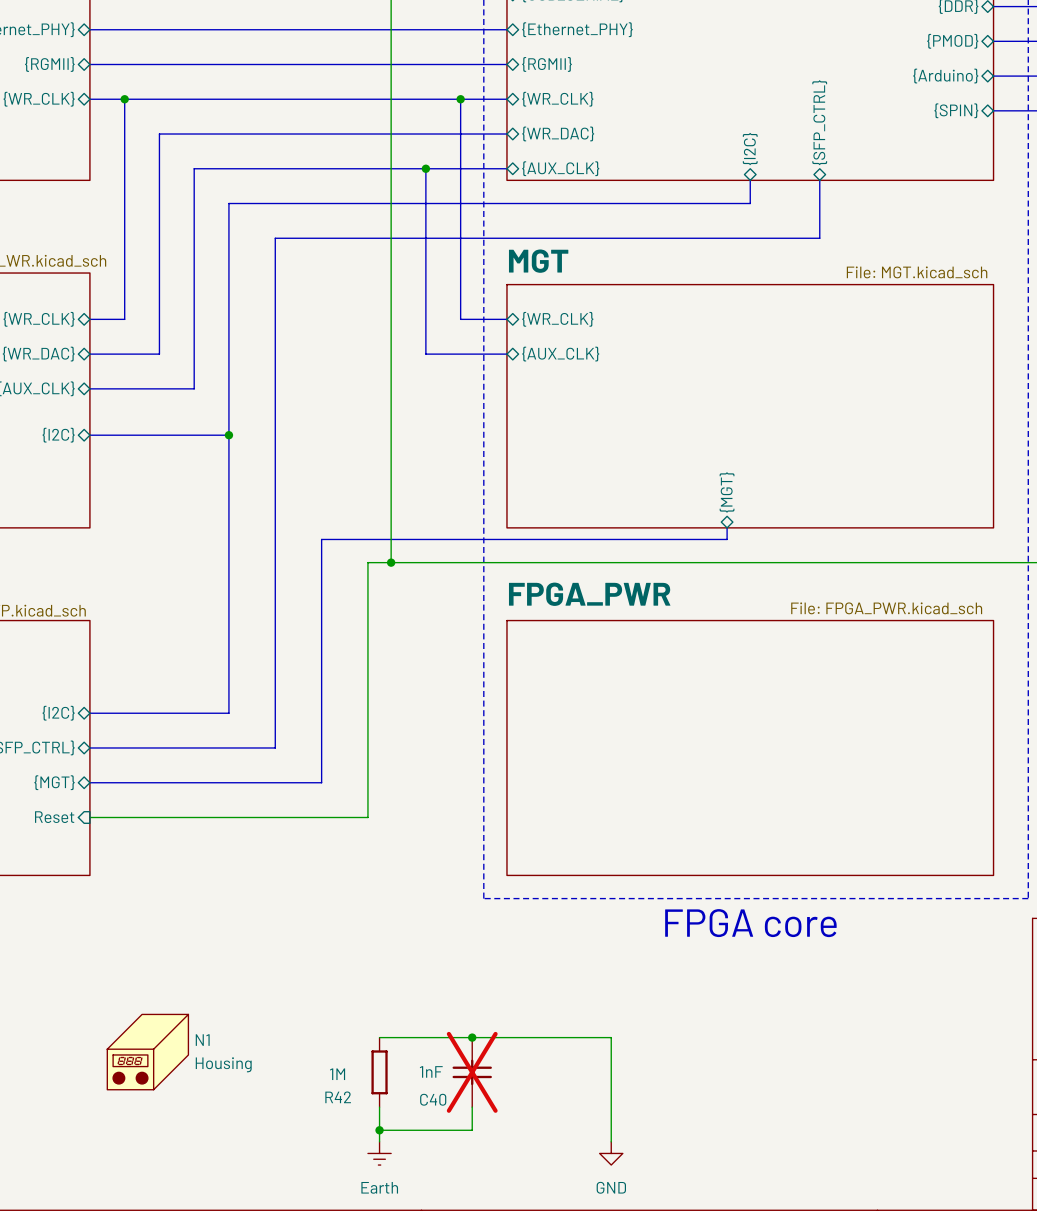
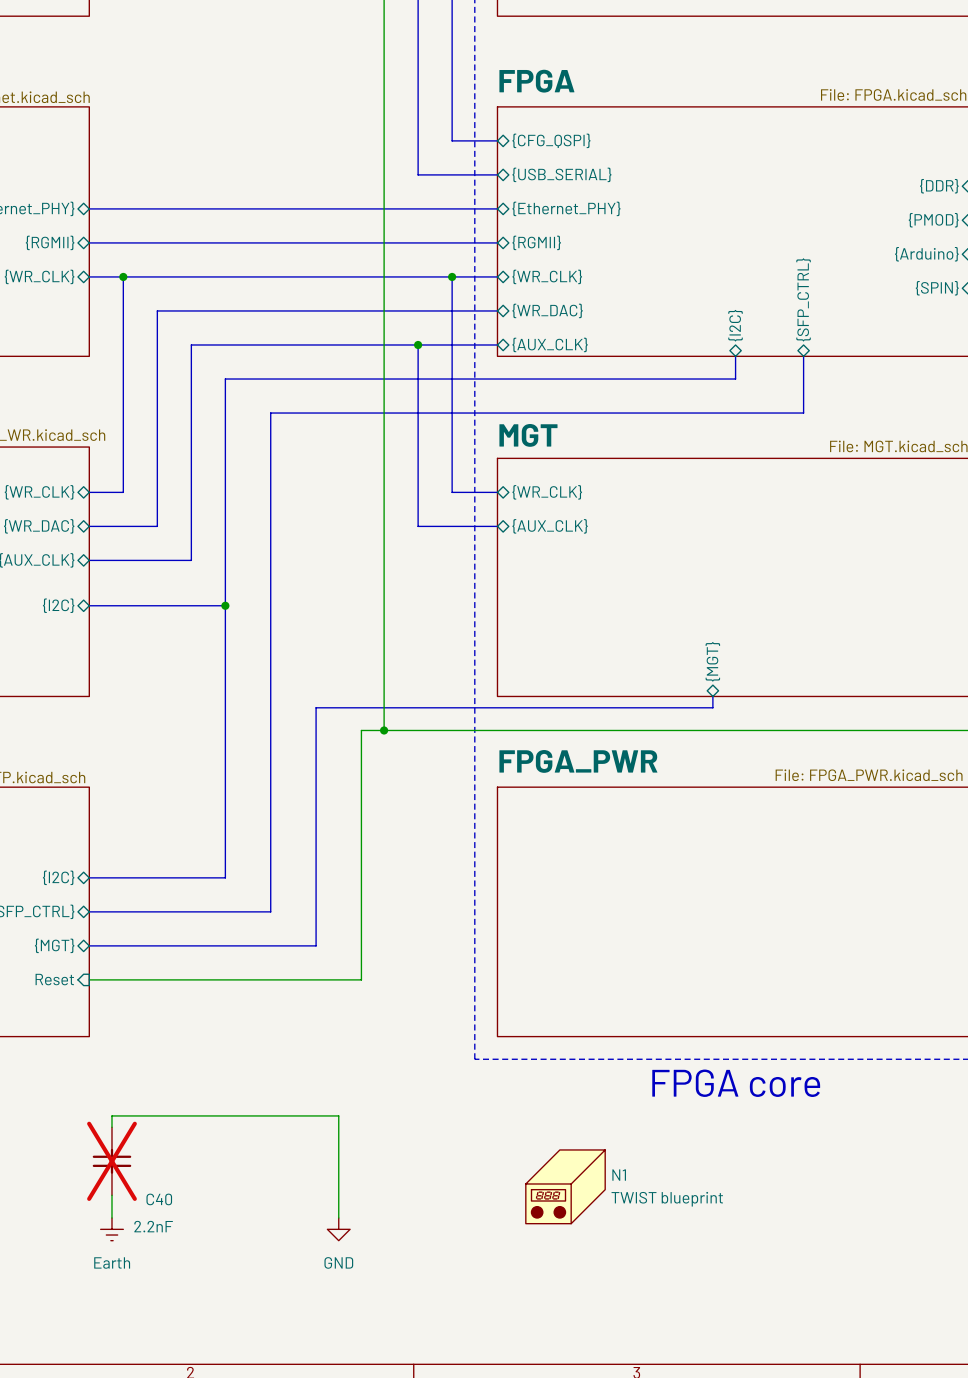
wire: none -> (111, 1127) (111, 1115) (338, 1115) (338, 1218)
wire: (379, 1037) (611, 1037) (611, 1141) -> none
junction: (472, 1037) -> none
N1 position: (147, 1052) -> (565, 1186)
N1 value: Housing (223, 1064) -> TWIST blueprint (667, 1199)
C40 text: 1nF (431, 1071) -> 2.2nF (153, 1226)
power symbol: none -> Earth (111, 1229)
power symbol: none -> GND (338, 1229)
R42: (379, 1072) -> none
C40 position: (472, 1072) -> (111, 1161)
C40 name position: C40 (433, 1099) -> C40 (159, 1199)
wire: (379, 1107) (379, 1141) -> none
wire: (472, 1107) (472, 1130) (379, 1130) -> none
junction: (379, 1130) -> none
power symbol: Earth (379, 1153) -> none
power symbol: GND (611, 1153) -> none

